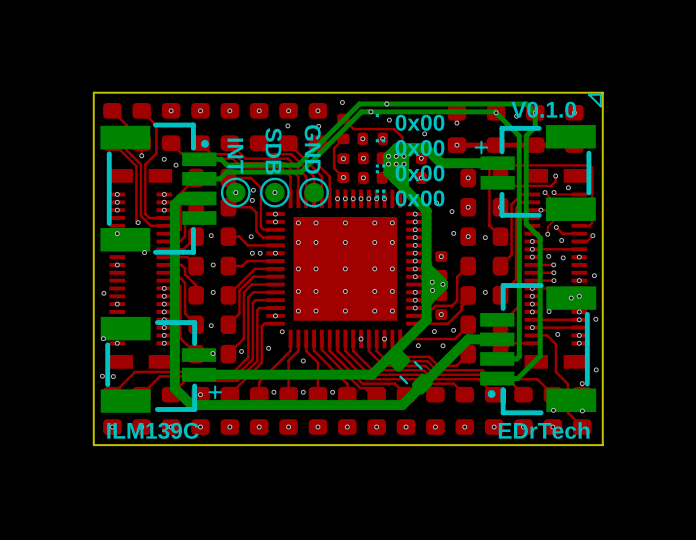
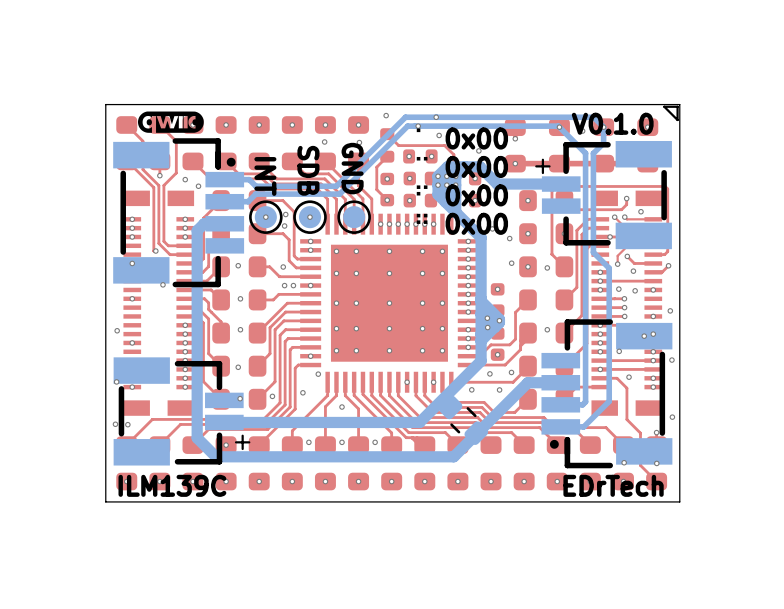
drawing: none -> [137, 111, 204, 133]

